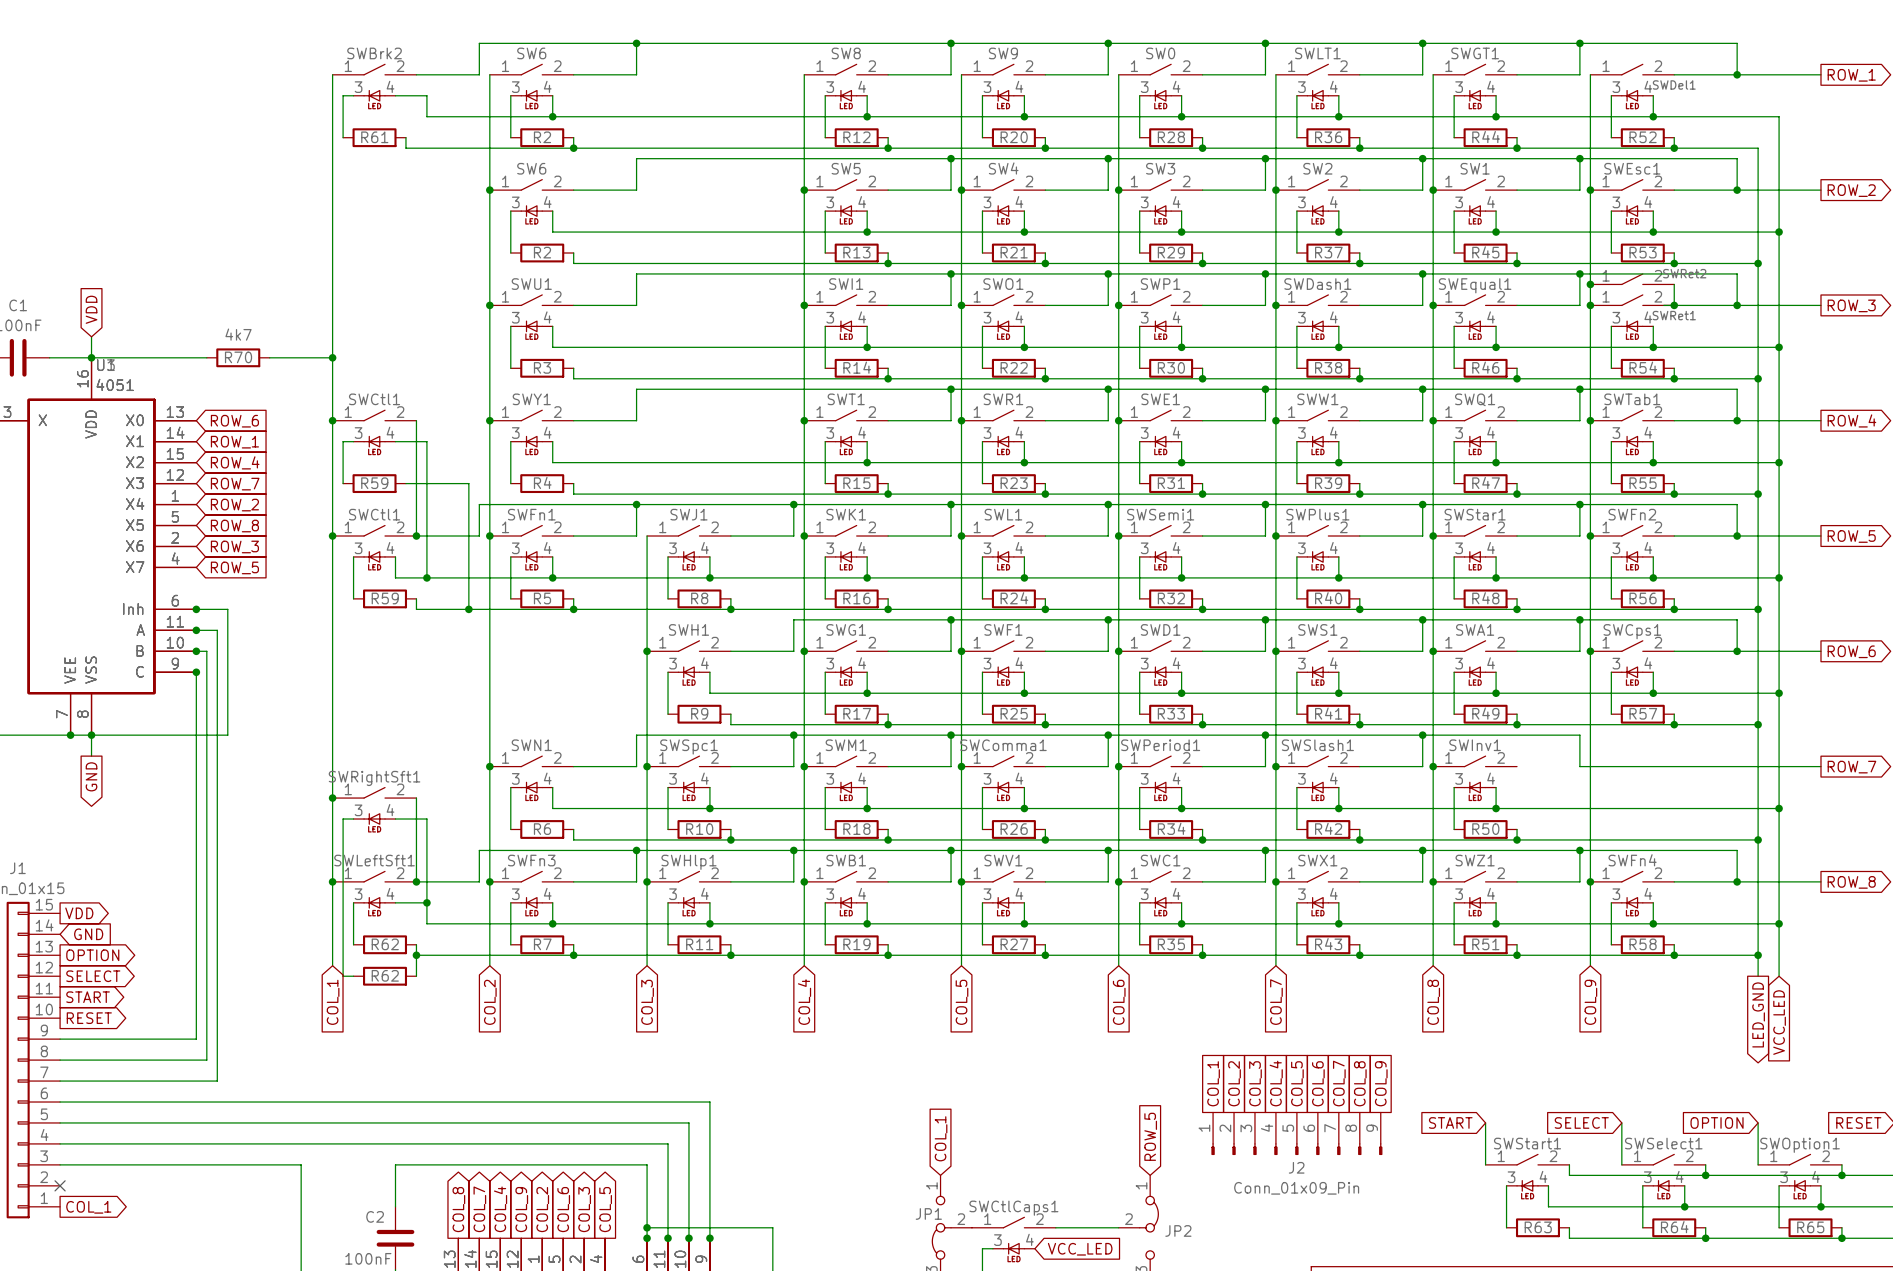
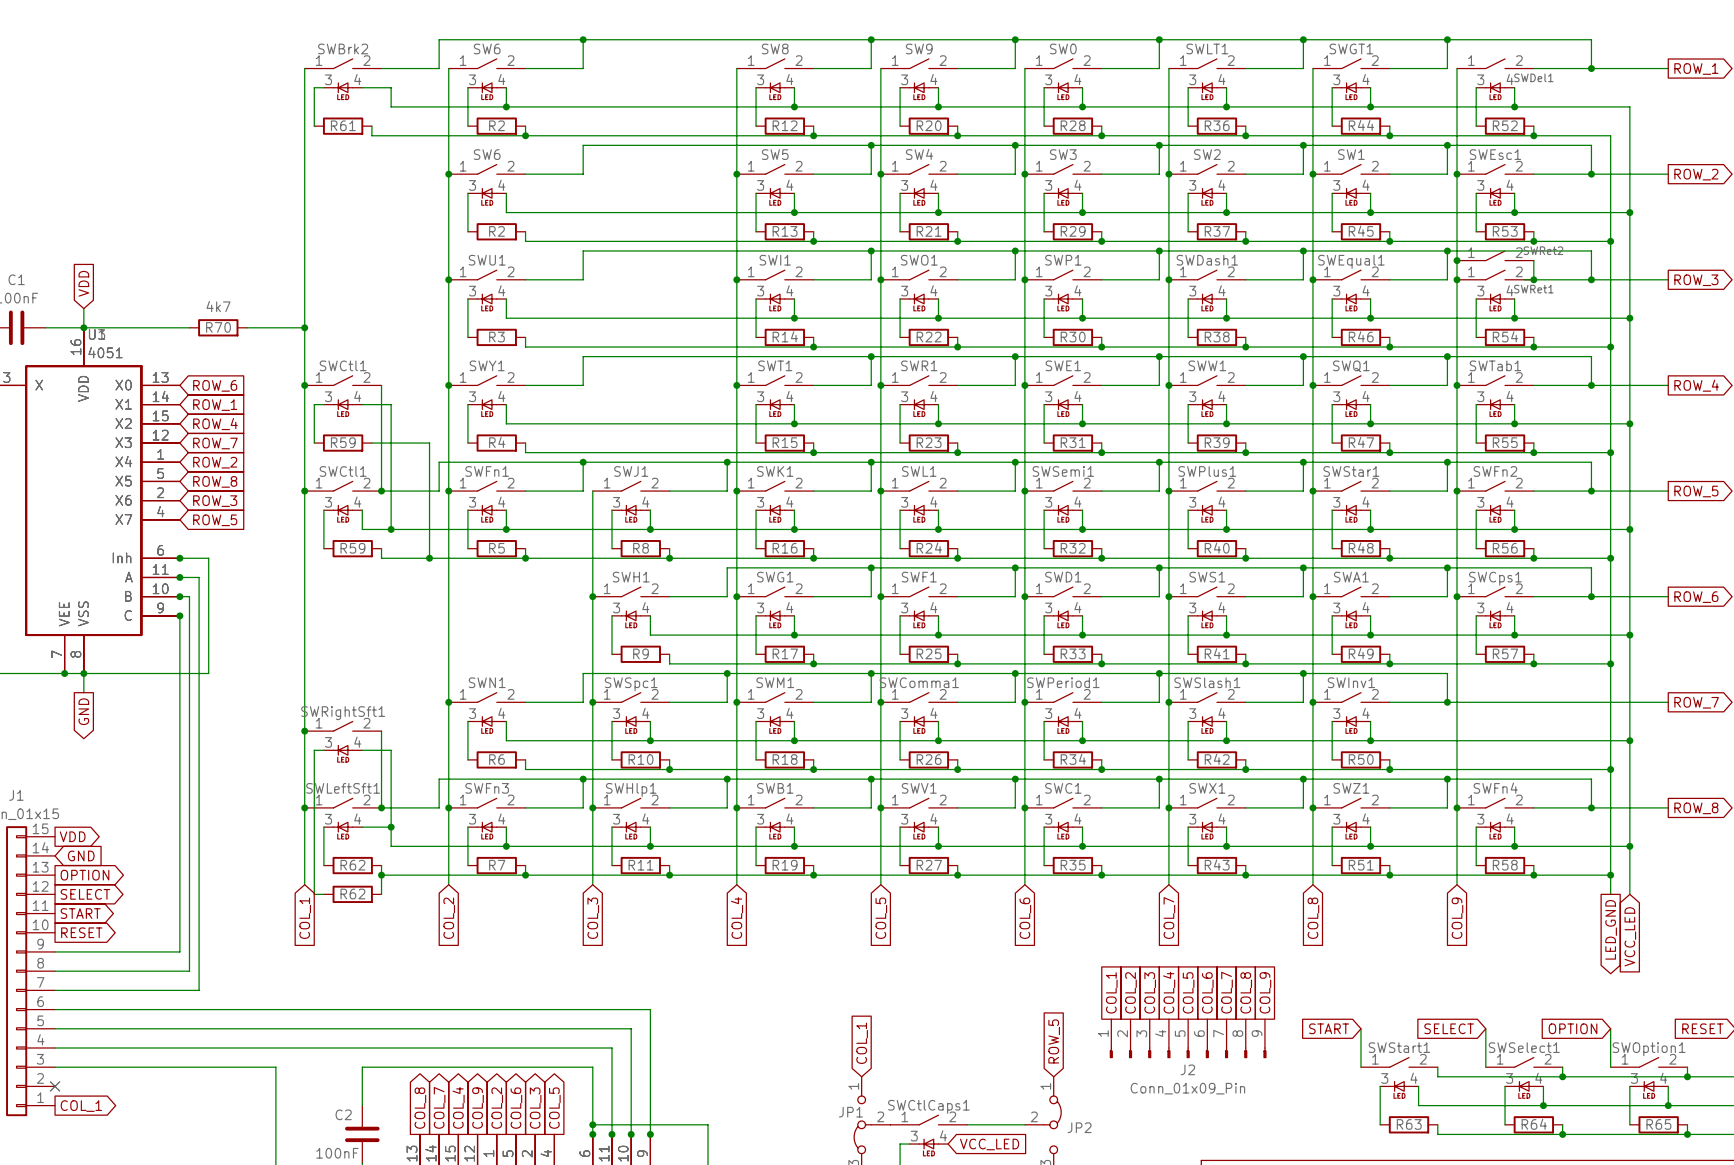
wire: none -> (1389, 702) (1447, 702)
junction: none -> (1447, 702)

